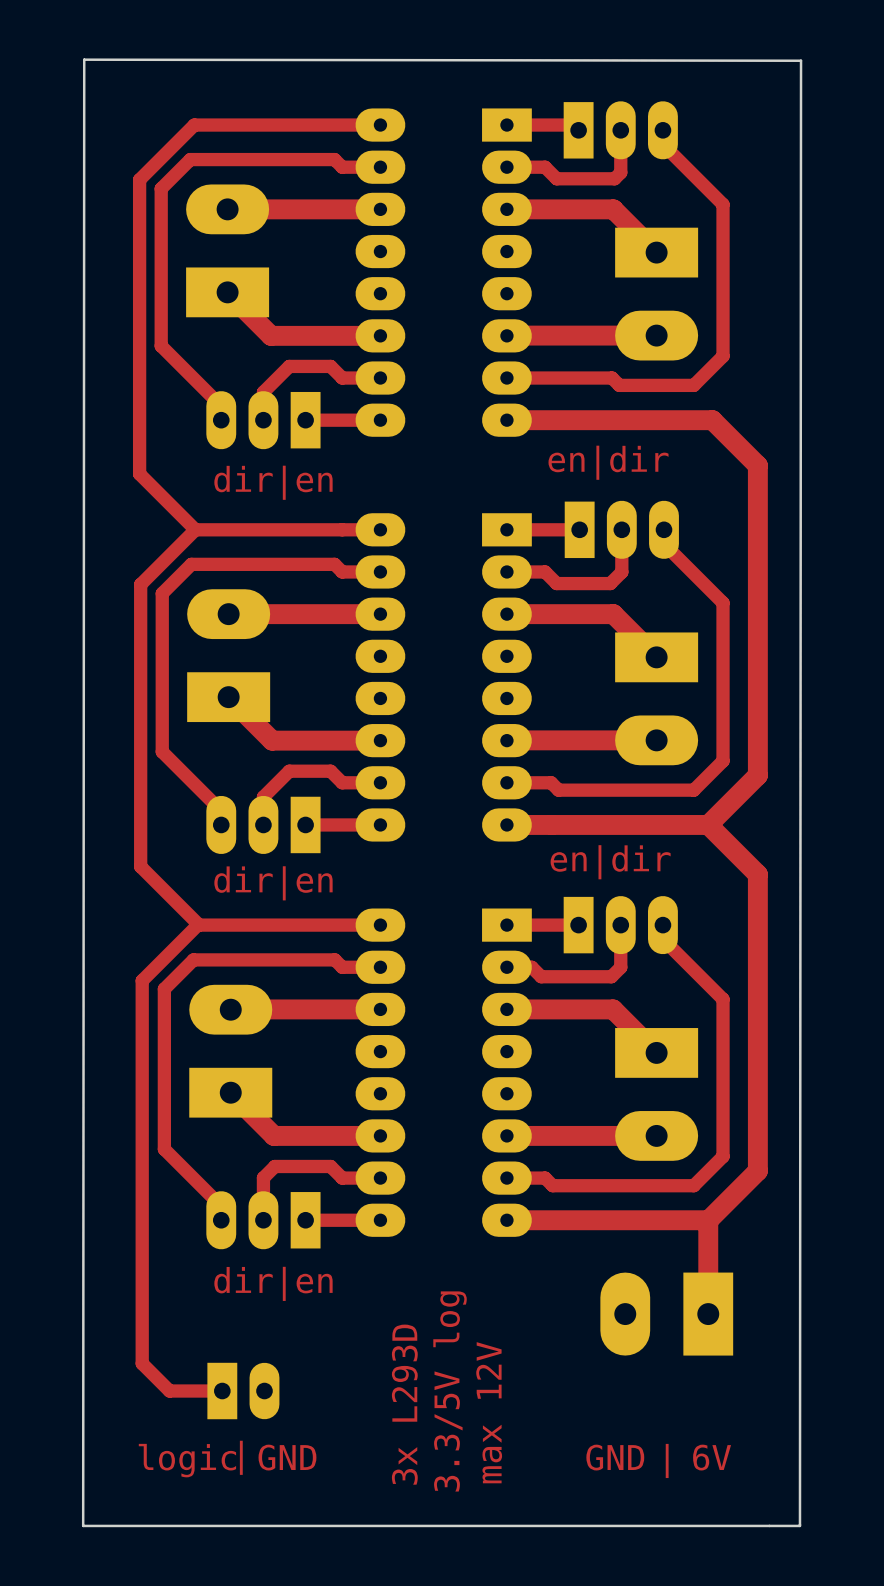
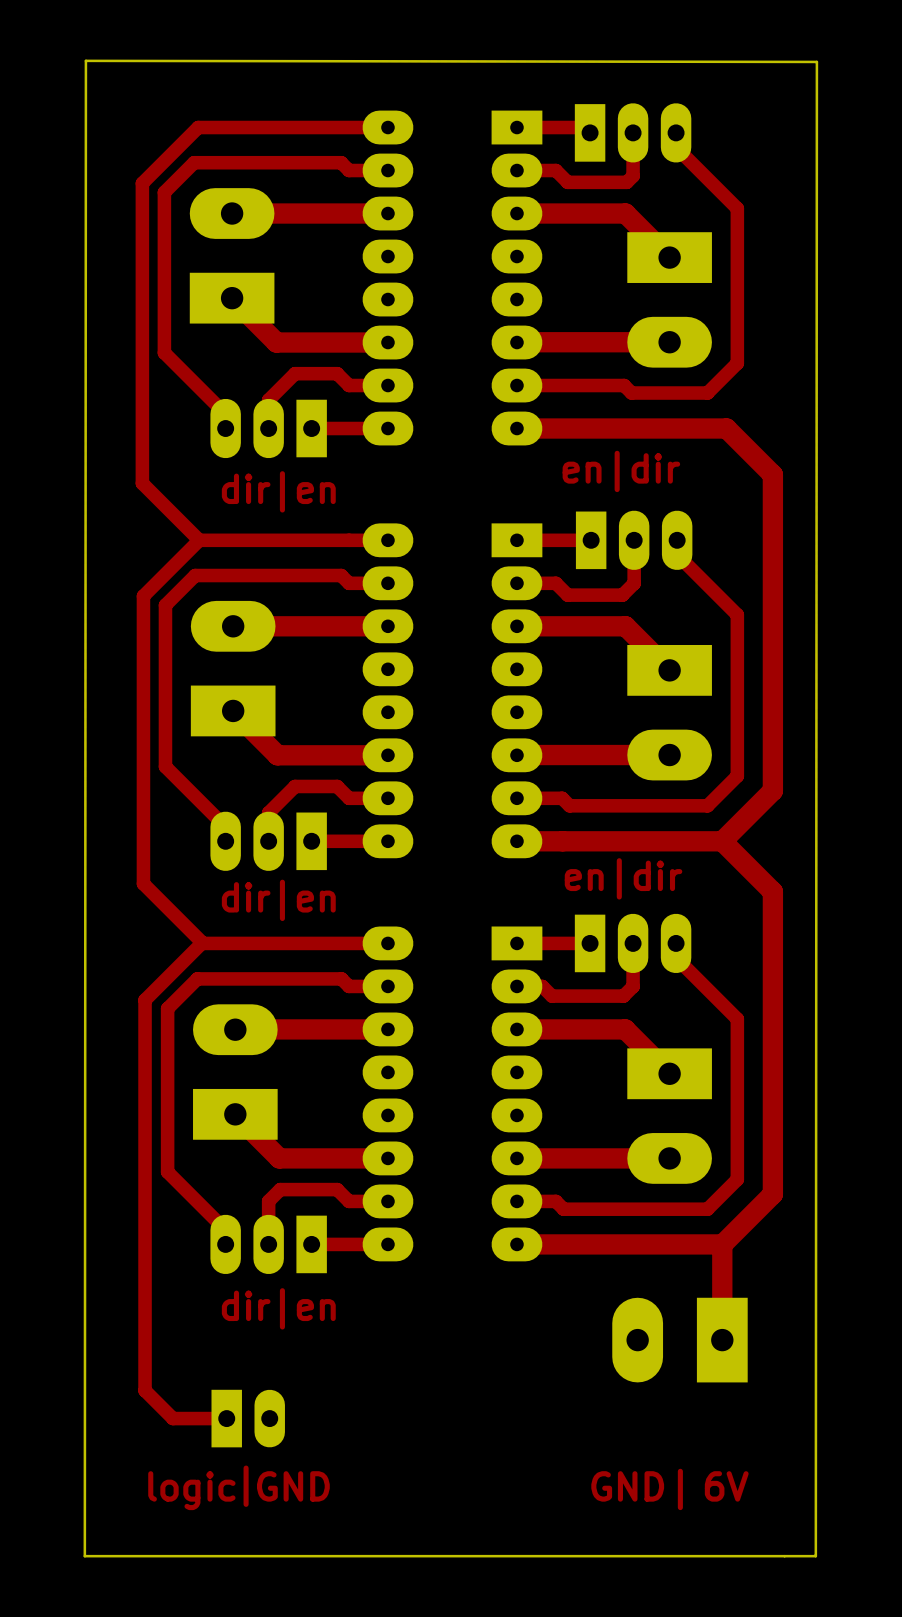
text: 3.3/5V log (450, 1391) -> none
text: 3x L293D (404, 1404) -> none
text: max 12V (489, 1412) -> none

